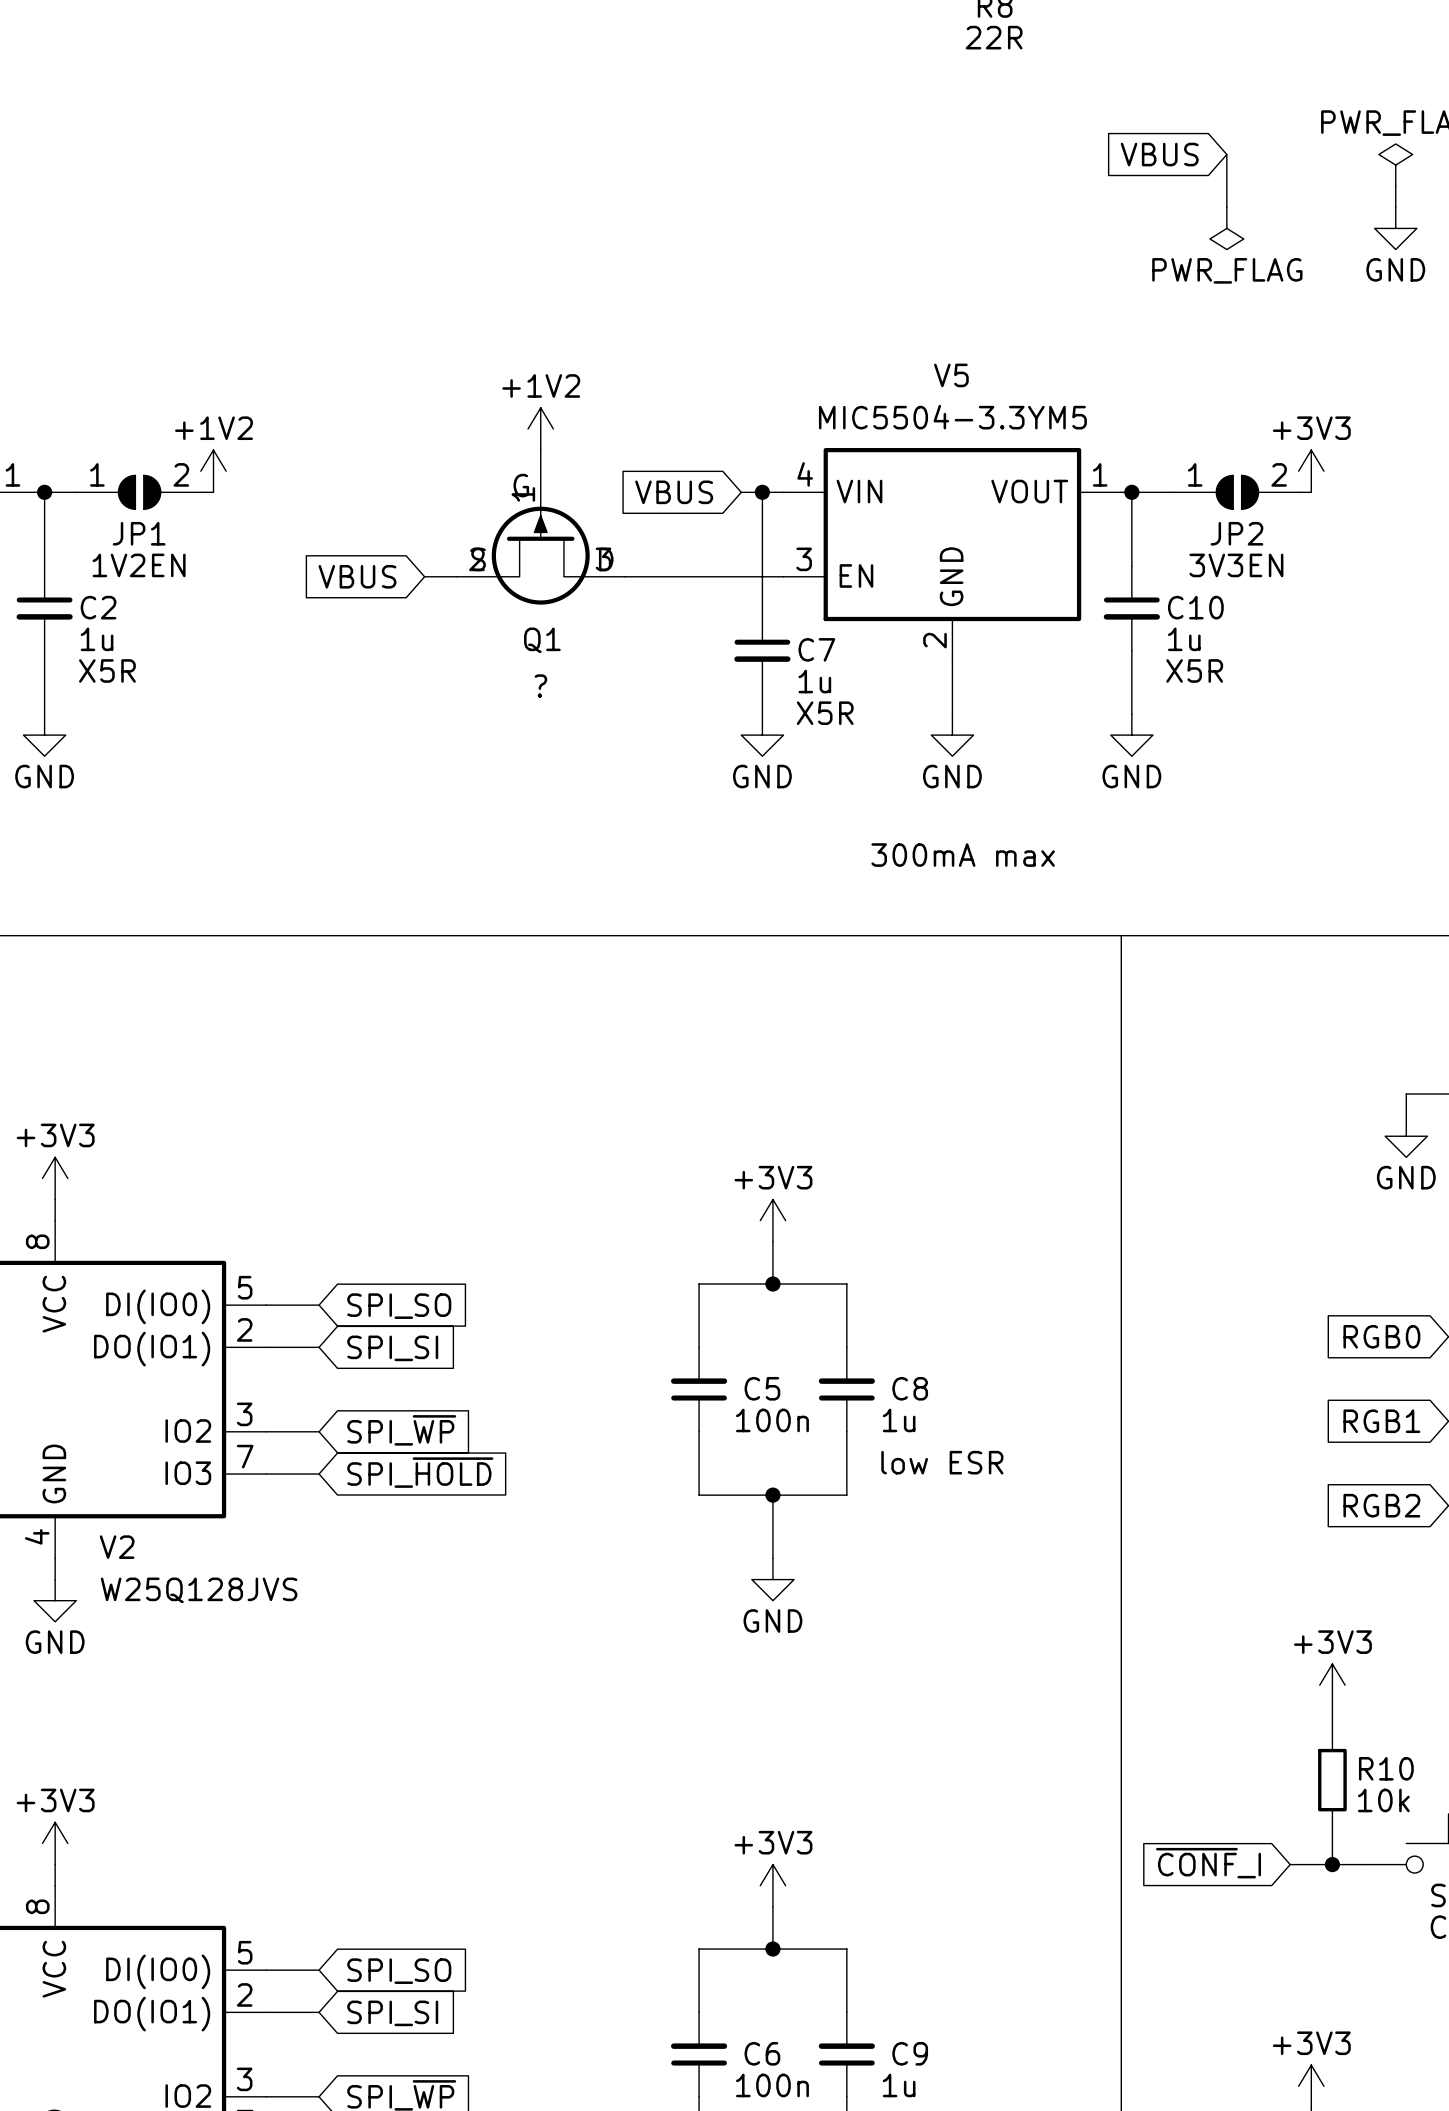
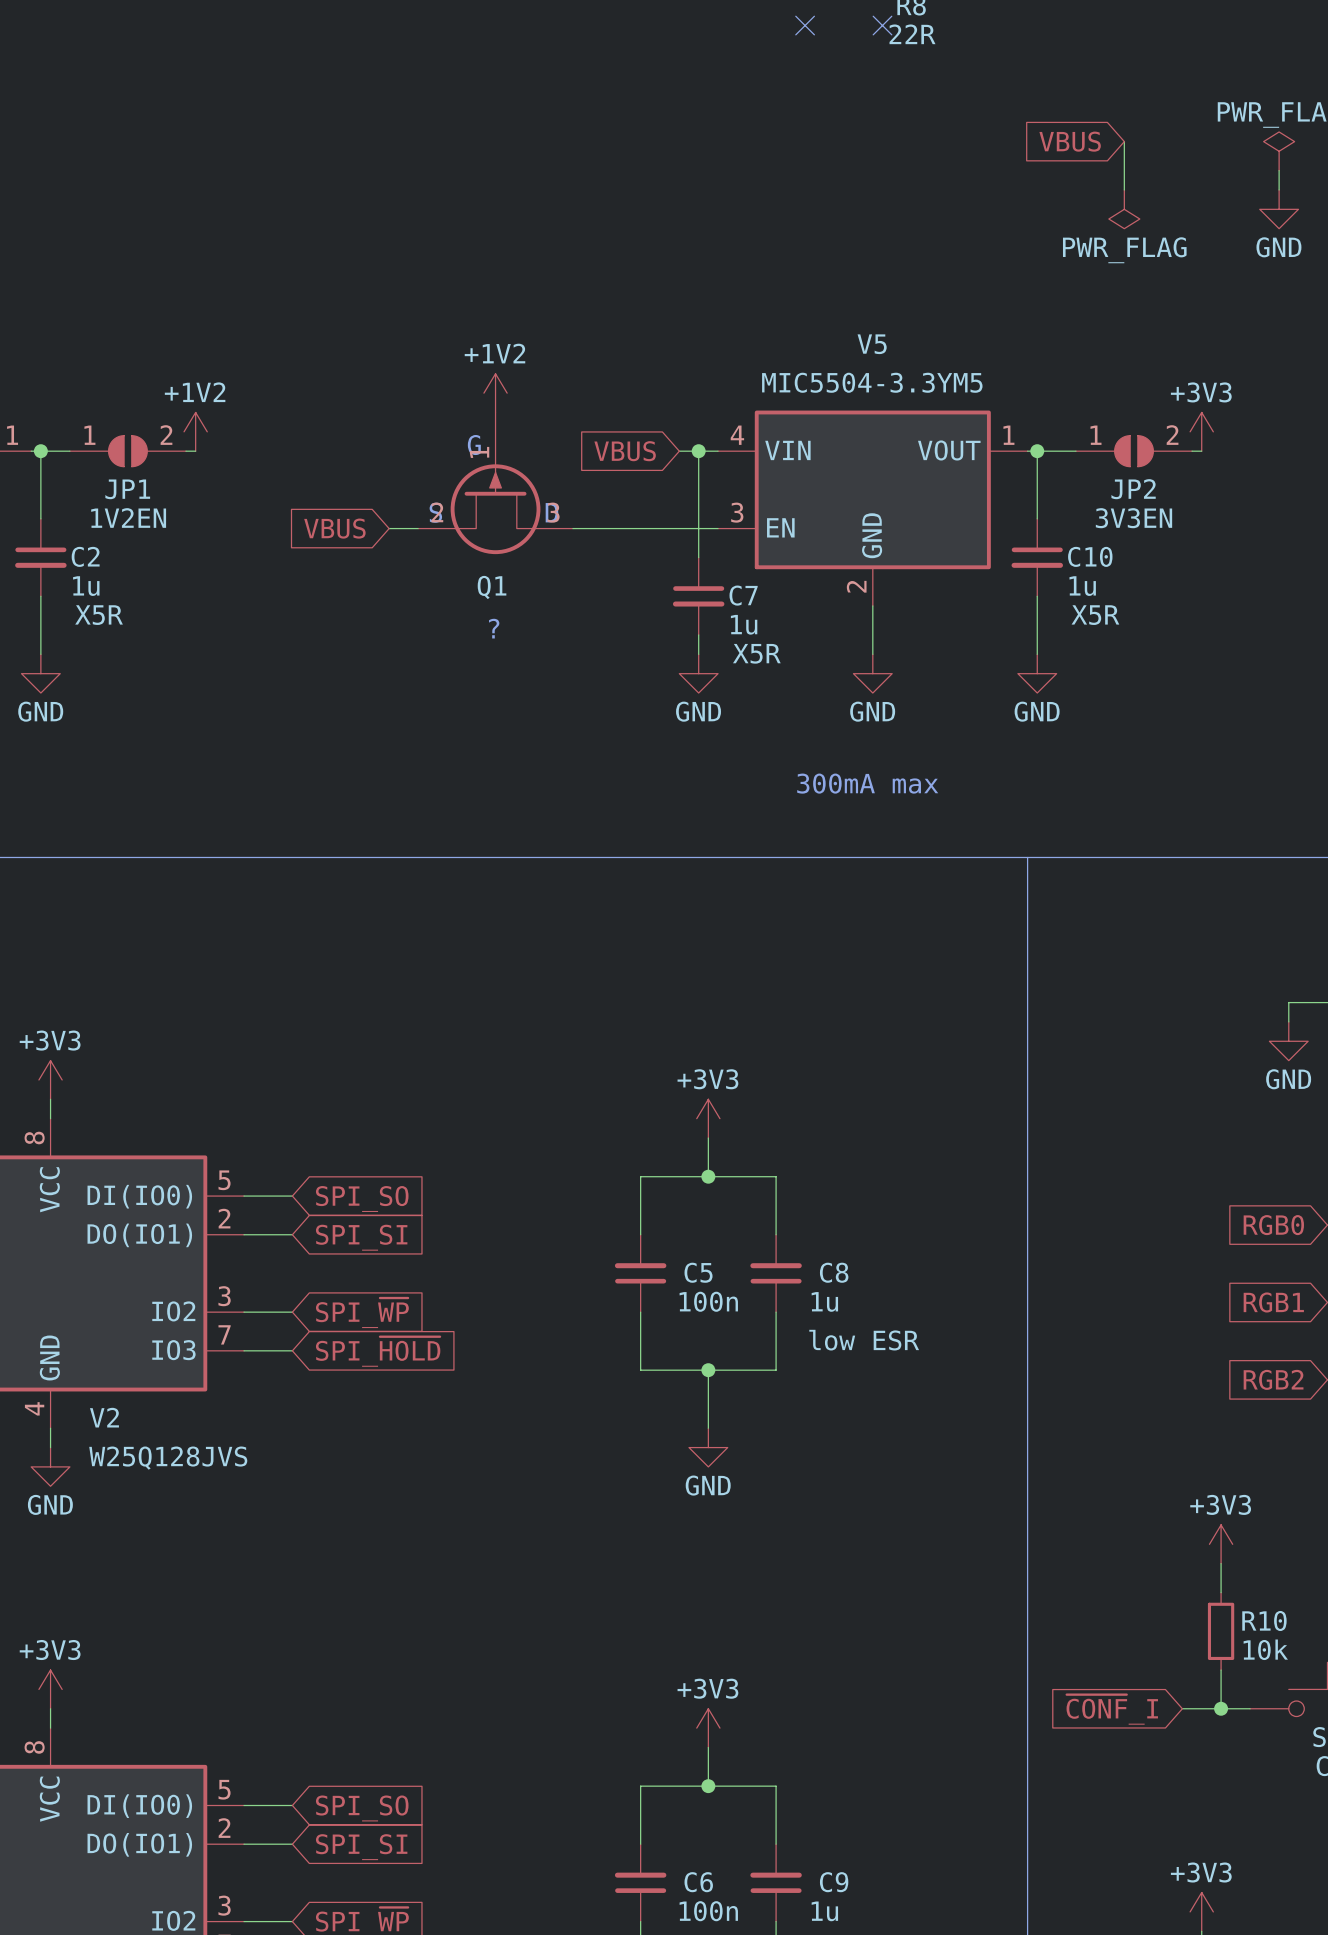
no-connect mark: none -> (805, 25)
no-connect mark: none -> (882, 25)

